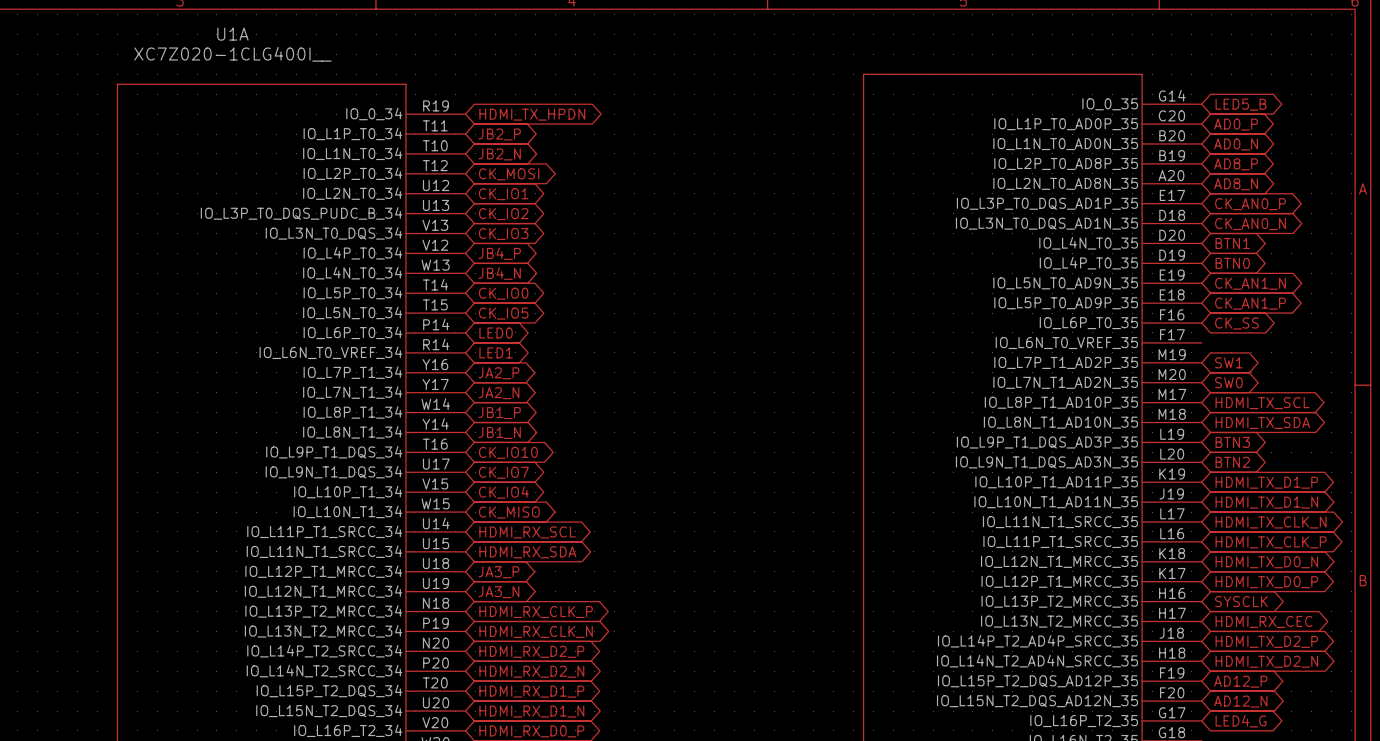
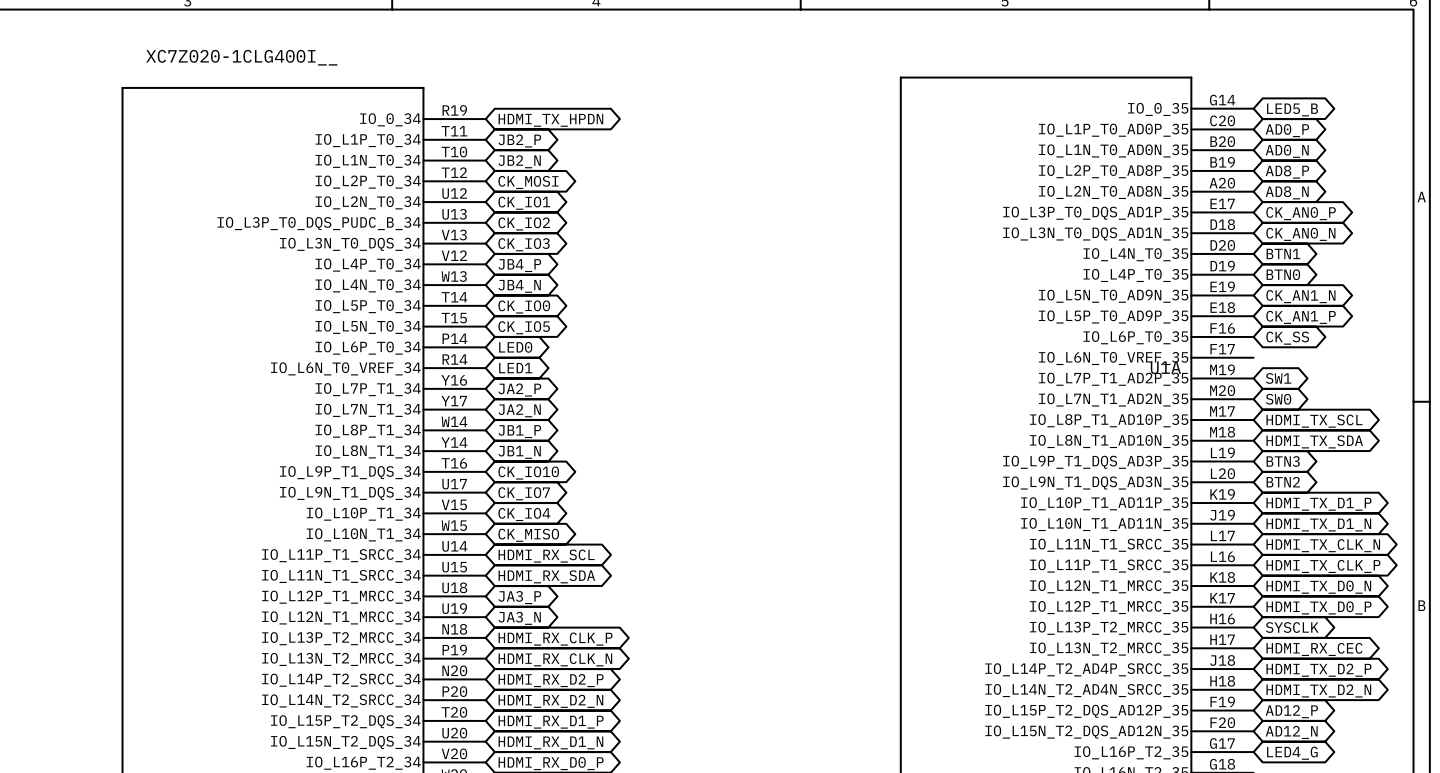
U1A name position: U1A (232, 34) -> U1A (1165, 367)

